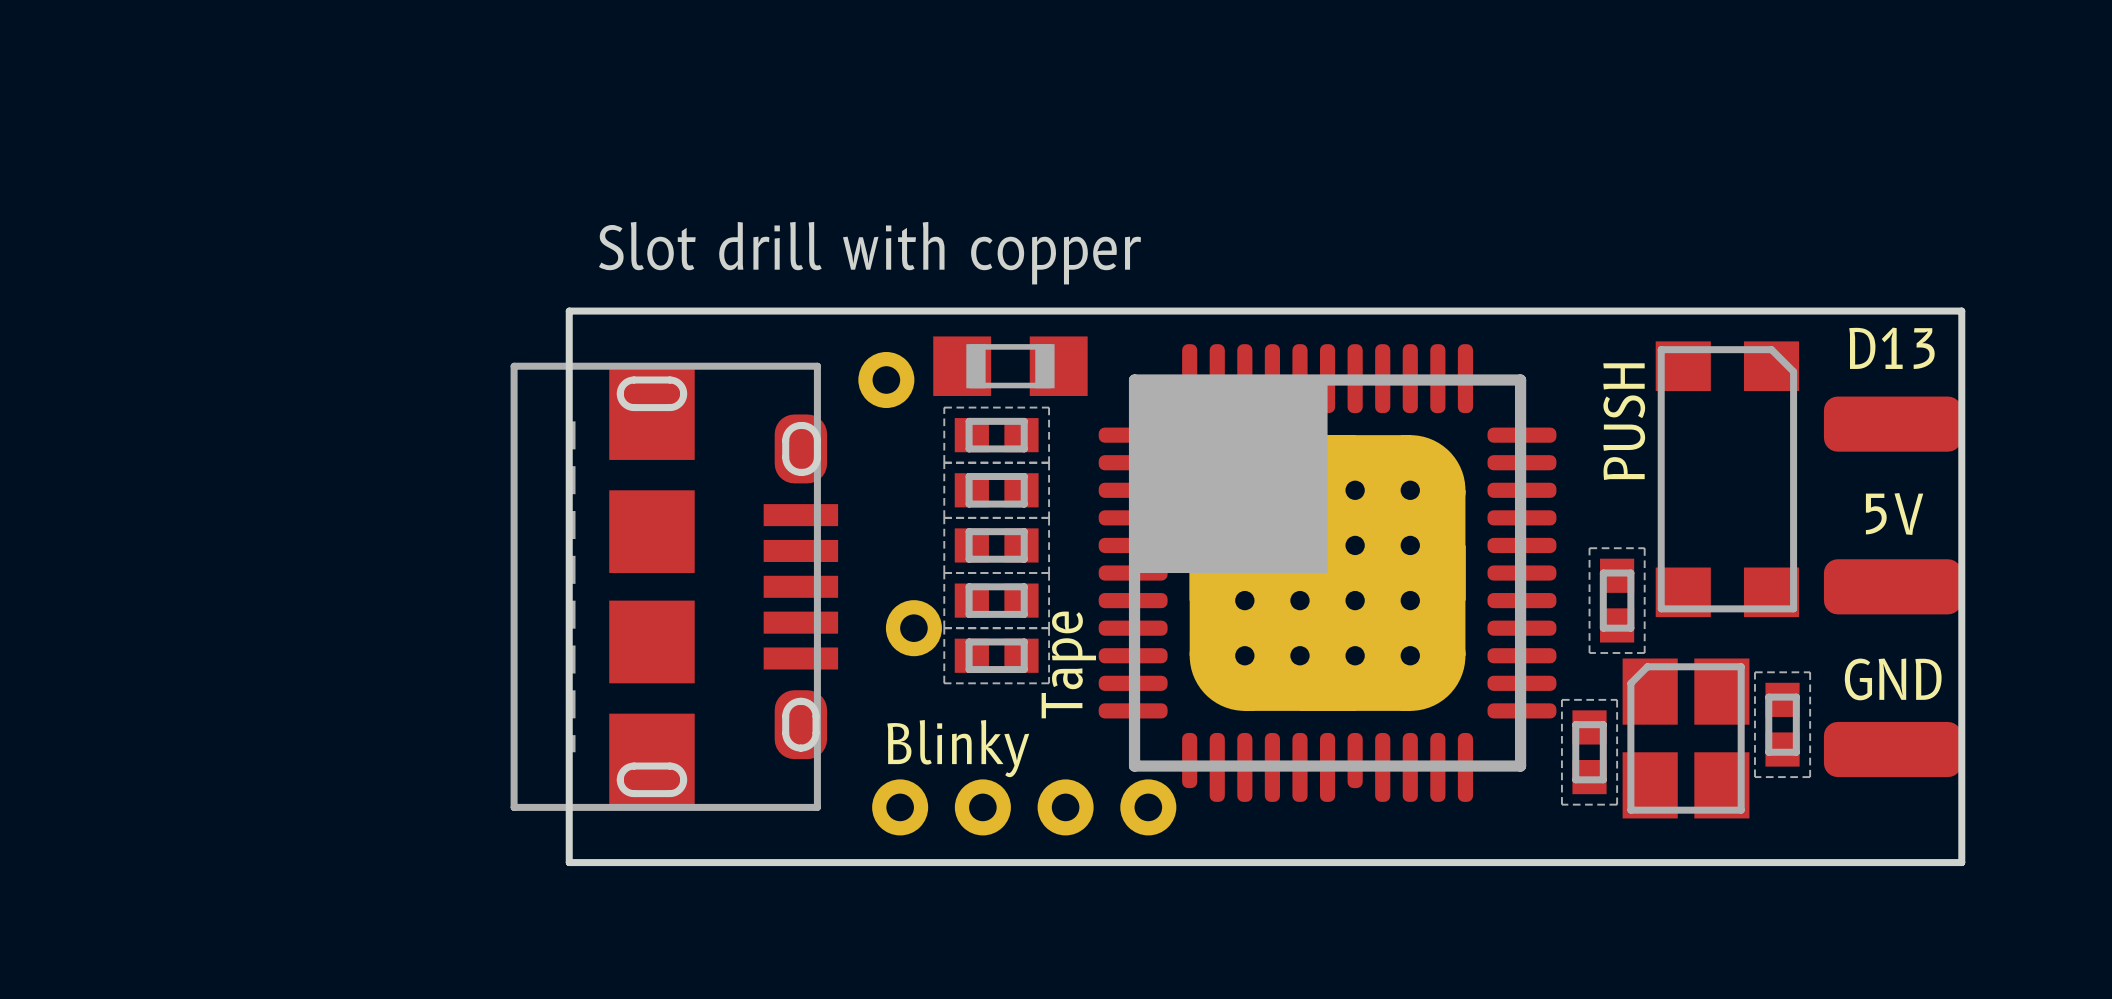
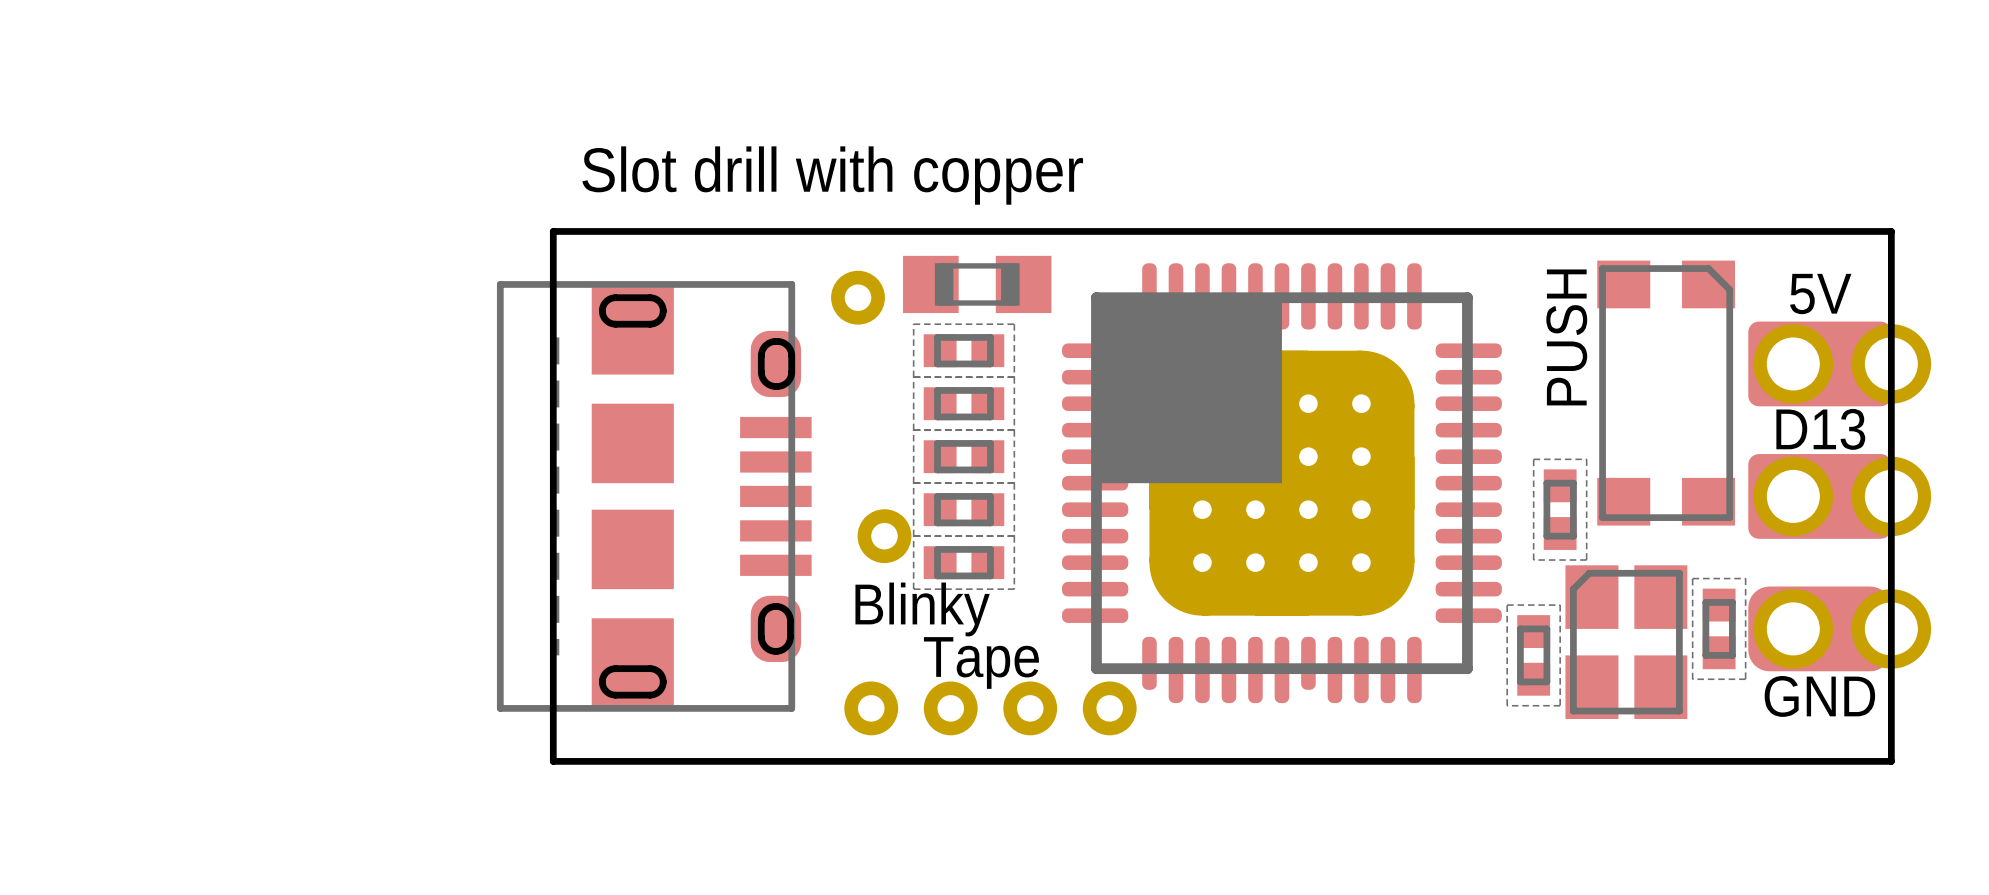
text: D13 (1891, 348) -> 5V (1820, 294)
part footprint: [1823, 396, 1962, 778] -> [1748, 321, 1932, 672]
text: 5V (1894, 514) -> D13 (1820, 429)
text rotation: 0° (1068, 664) -> 90° clockwise (981, 662)
text position: GND (1893, 679) -> GND (1819, 696)
text position: Blinky (958, 748) -> Blinky (922, 609)

